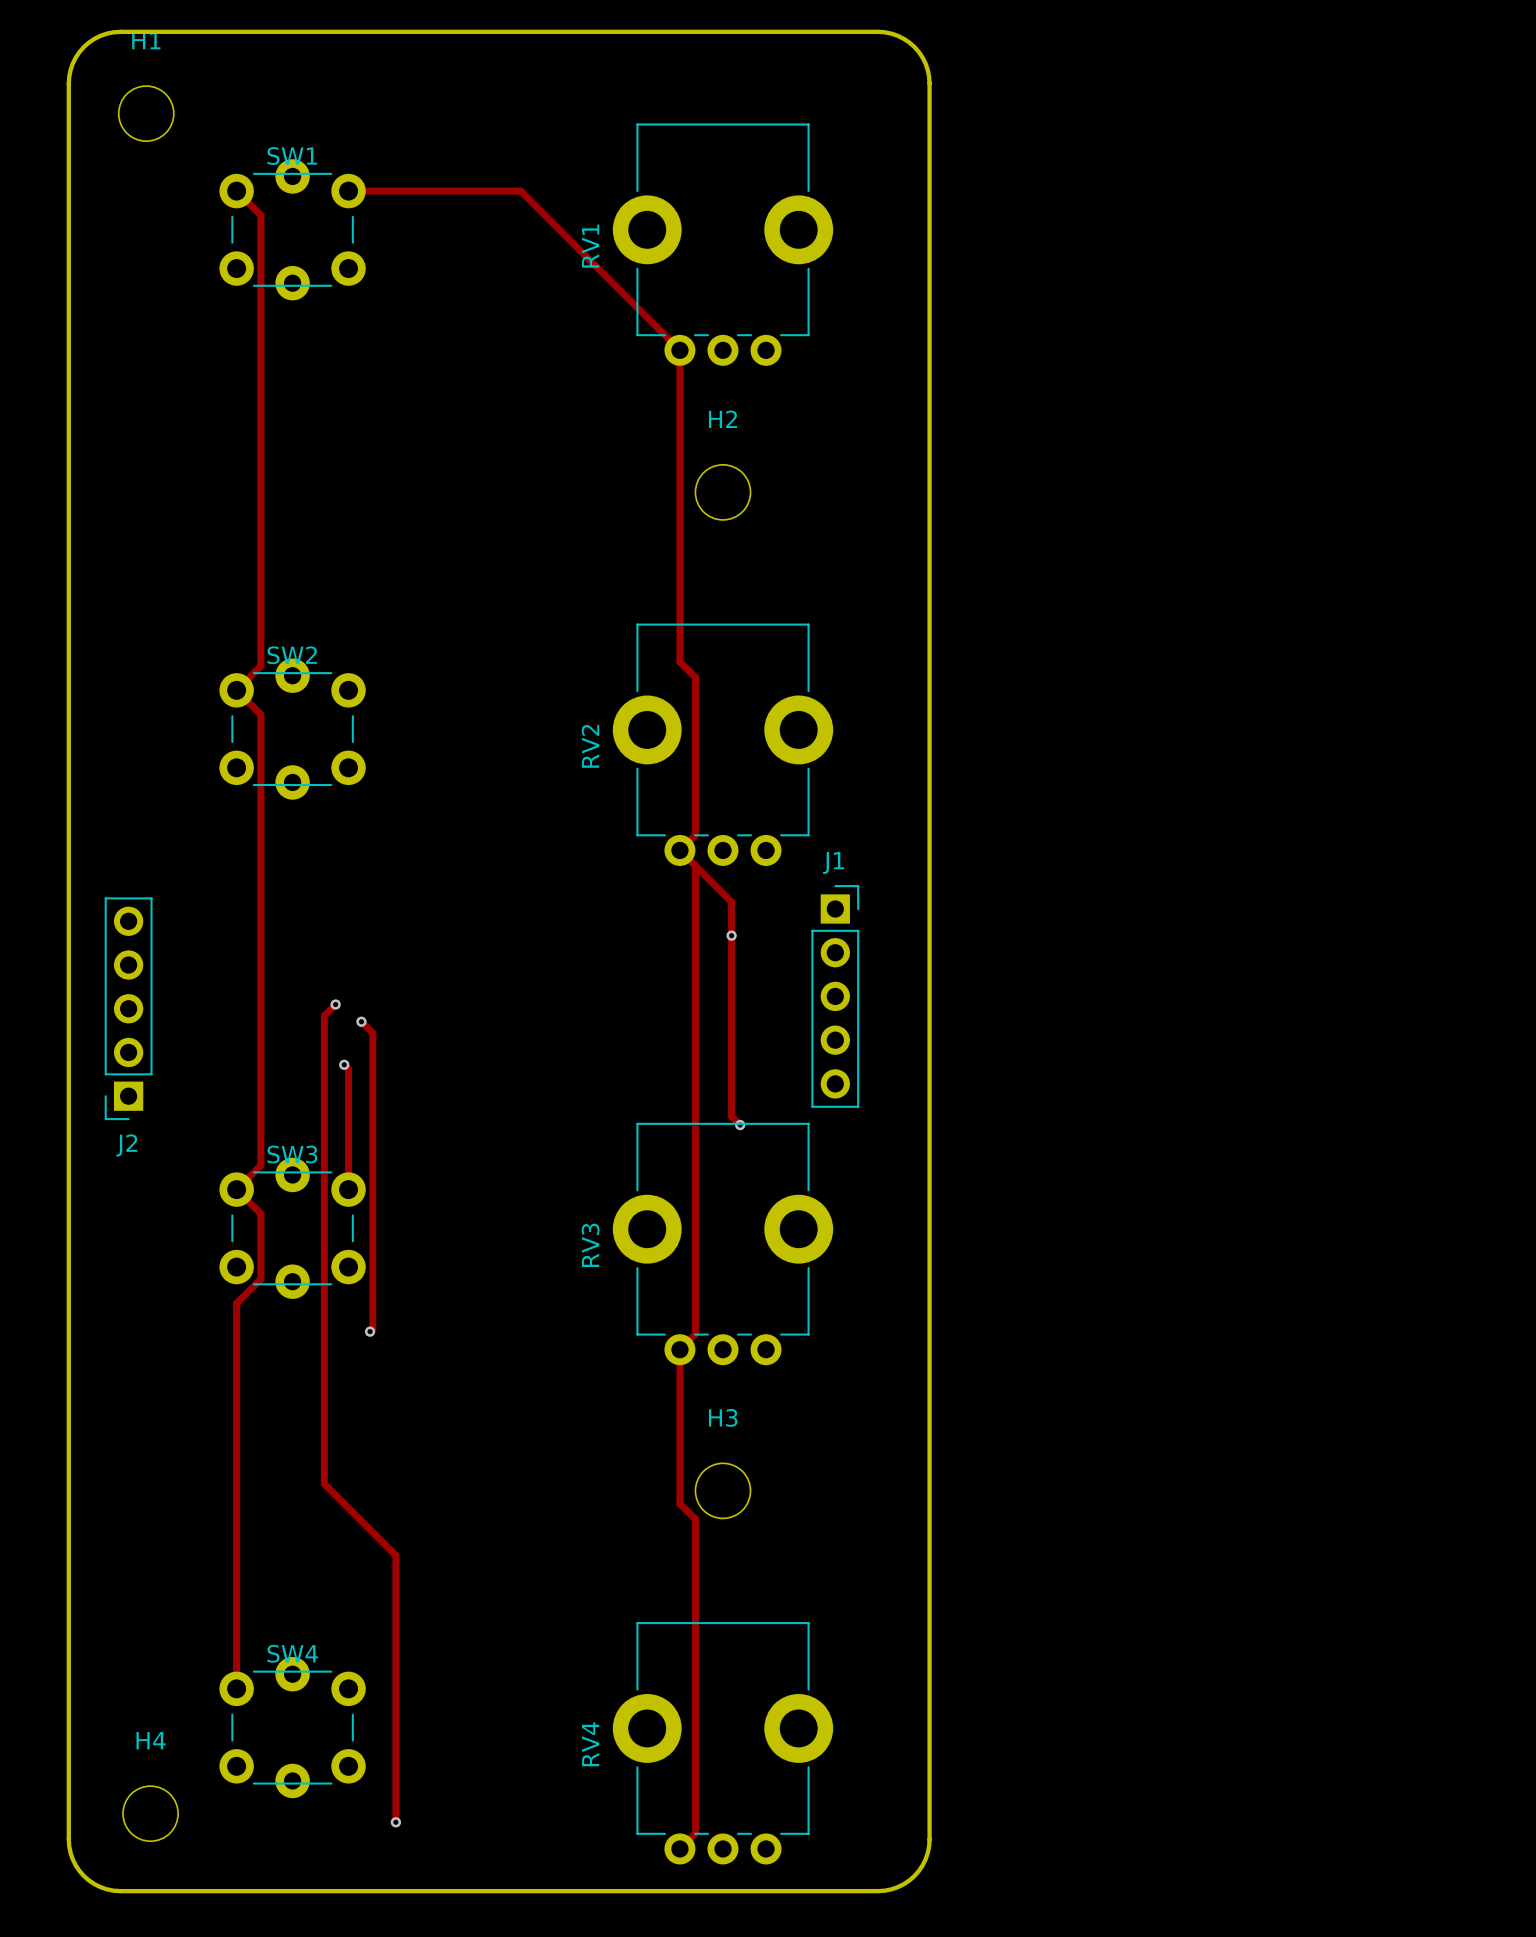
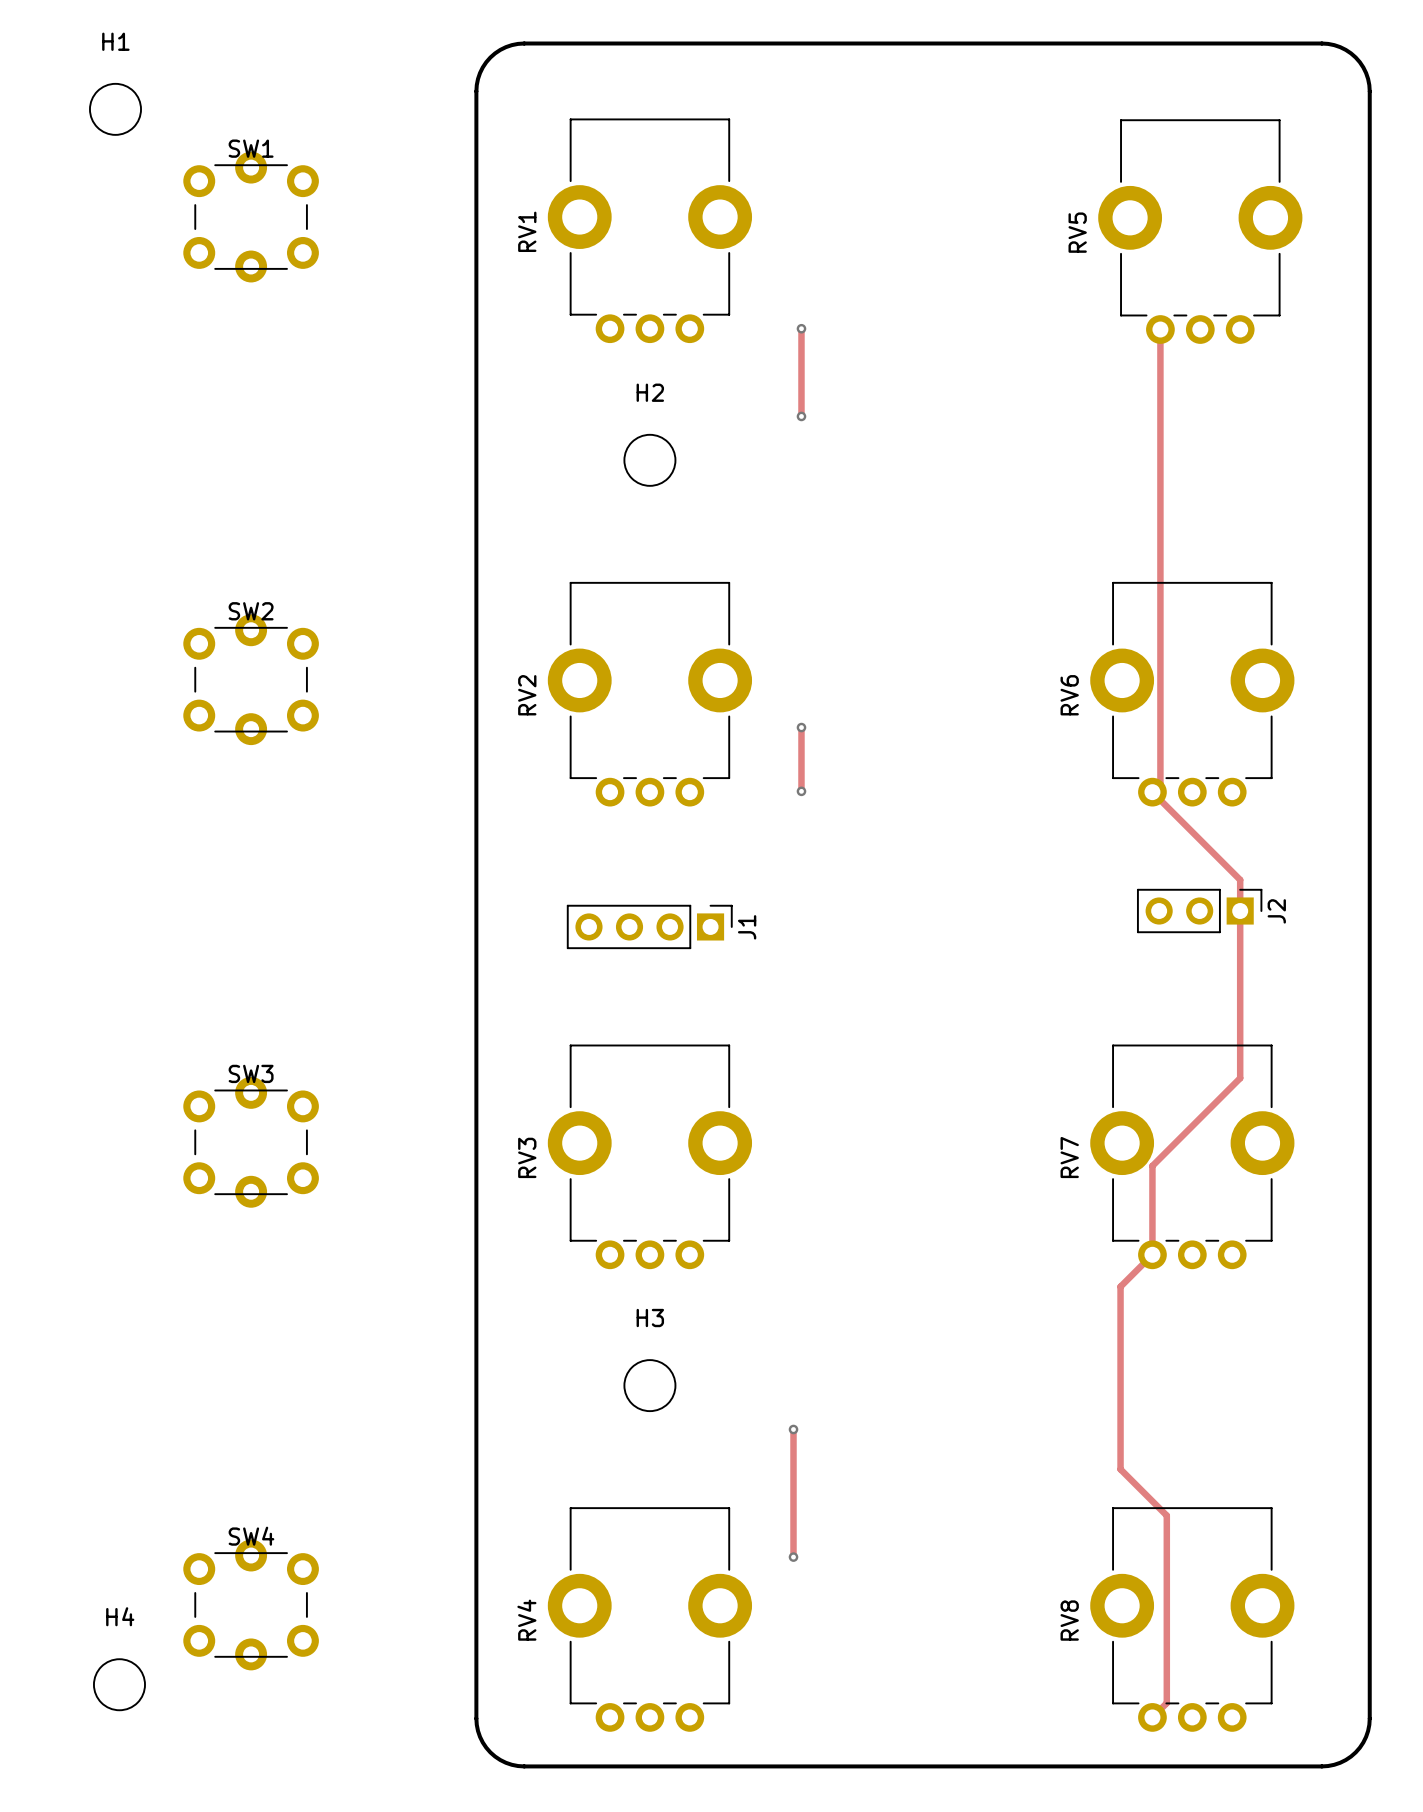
board edge: (120, 31) (877, 31) (891, 33) (903, 38) (918, 52) (925, 63) (929, 83) (929, 1839) (927, 1852) (922, 1865) (909, 1880) (897, 1887) (877, 1891) (120, 1891) (100, 1887) (89, 1880) (79, 1870) (72, 1859) (68, 1839) (68, 83) (72, 63) (83, 46) (100, 35) (120, 31) -> none
board edge: none -> (524, 43) (1321, 43) (1334, 45) (1345, 49) (1355, 57) (1366, 73) (1369, 91) (1369, 1718) (1368, 1730) (1363, 1742) (1351, 1756) (1340, 1762) (1321, 1766) (524, 1766) (511, 1764) (500, 1760) (486, 1747) (480, 1736) (476, 1718) (476, 91) (480, 73) (490, 57) (505, 47) (524, 43)
track: (236, 191) (260, 215) (260, 666) (236, 690) (260, 714) (260, 1165) (236, 1189) (260, 1213) (260, 1279) (236, 1303) (236, 1688) -> none
track: (348, 191) (520, 191) (679, 350) (679, 661) (695, 677) (695, 834) (679, 850) (731, 902) (731, 1116) (740, 1125) -> none
RV5: none -> (1200, 231)
track: none -> (801, 328) (801, 416)
via: none -> (801, 328)
track: none -> (1160, 329) (1160, 784) (1152, 792) (1240, 879) (1240, 1078) (1152, 1165) (1152, 1254) (1120, 1286) (1120, 1469) (1166, 1515) (1166, 1703) (1152, 1717)
via: none -> (801, 416)
RV6: none -> (1192, 694)
track: none -> (801, 727) (801, 791)
via: none -> (801, 727)
via: none -> (801, 791)
J1 name position: J1 (833, 863) -> J1 (747, 927)
track: (695, 865) (695, 1334) (679, 1349) (679, 1503) (695, 1519) (695, 1833) (679, 1848) -> none
J1 footprint: [811, 885, 860, 1108] -> [566, 904, 733, 950]
J2 footprint: [104, 897, 153, 1121] -> [1136, 888, 1263, 934]
via: (731, 935) -> none
track: (335, 1004) (324, 1015) (324, 1483) (395, 1555) (395, 1822) -> none
via: (335, 1004) -> none
track: (361, 1021) (372, 1033) (372, 1328) (370, 1331) -> none
via: (361, 1021) -> none
track: (344, 1064) (348, 1069) (348, 1189) -> none
via: (344, 1064) -> none
via: (740, 1125) -> none
J2 name position: J2 (126, 1145) -> J2 (1276, 911)
RV7: none -> (1192, 1156)
via: (370, 1331) -> none
track: none -> (793, 1429) (793, 1557)
via: none -> (793, 1429)
via: none -> (793, 1557)
RV8: none -> (1192, 1619)
via: (395, 1822) -> none

